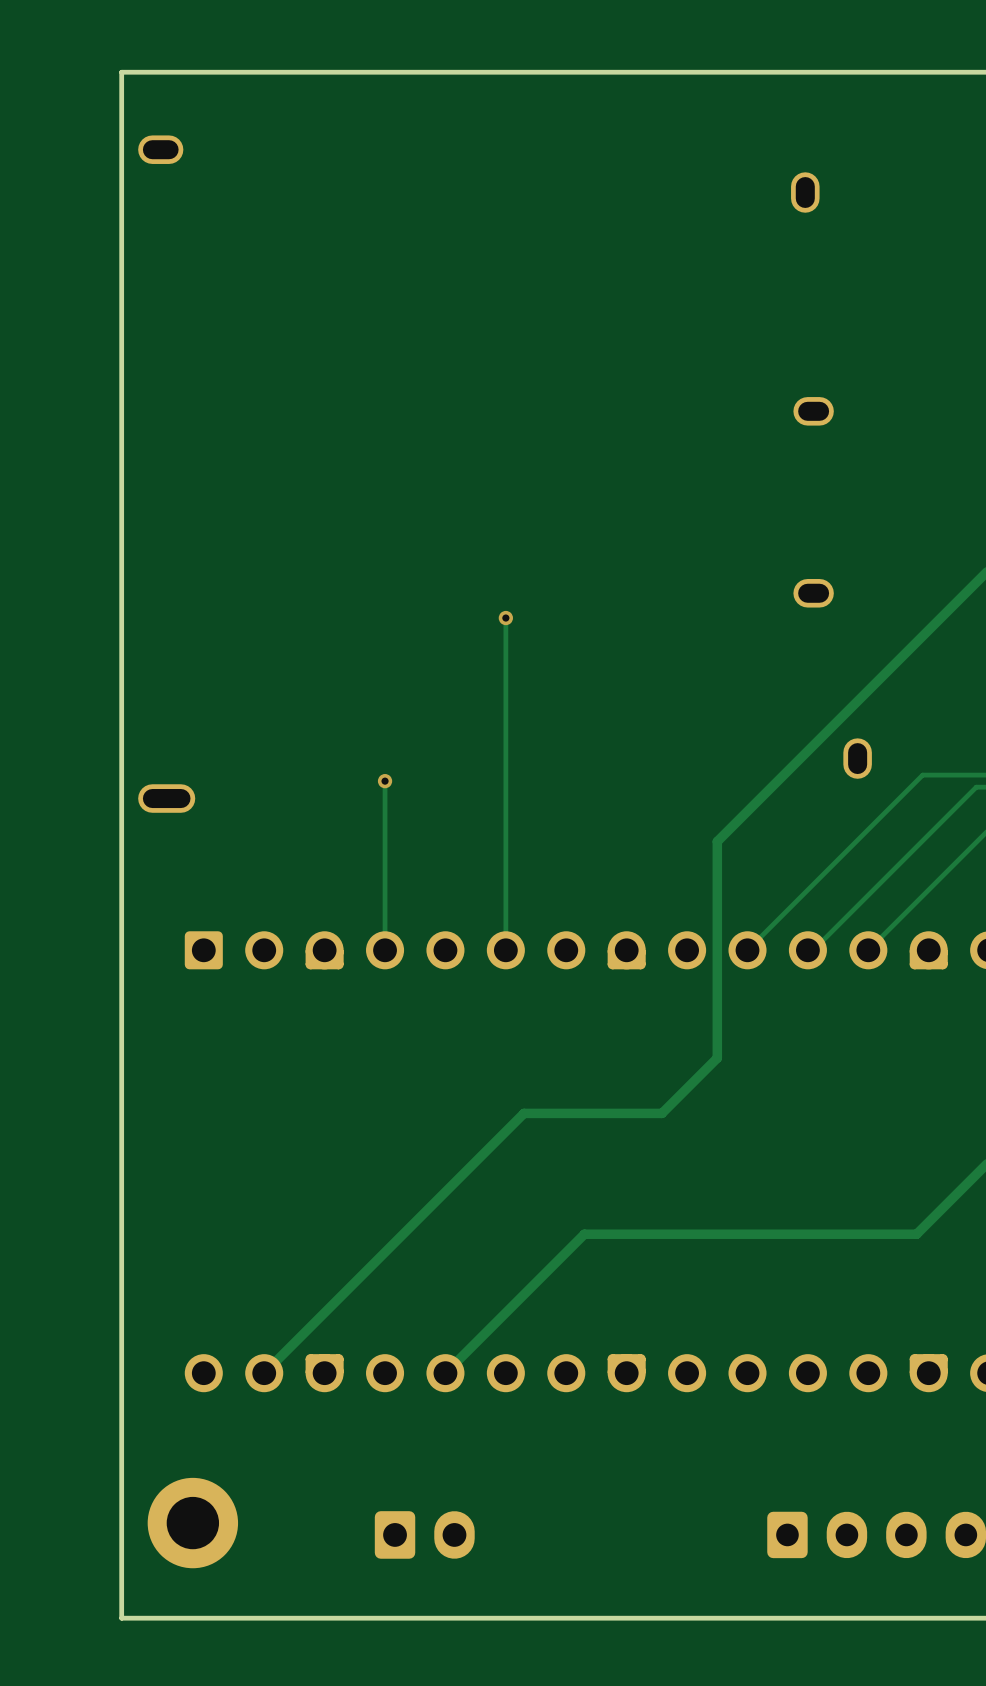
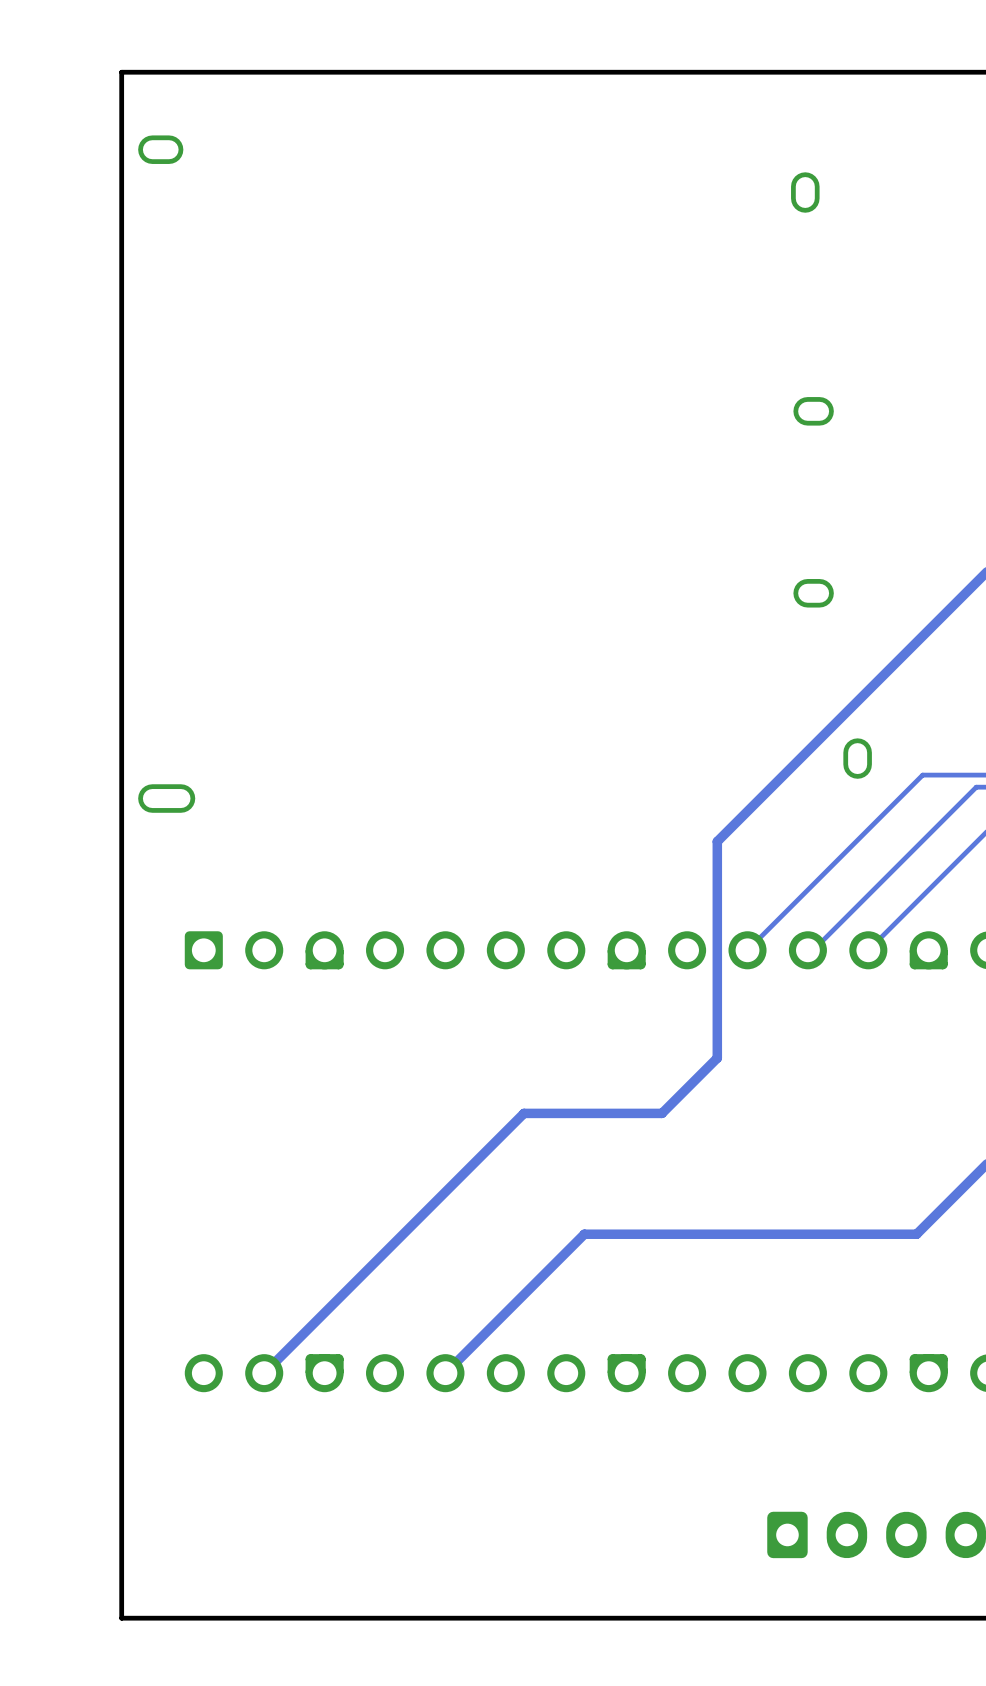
track: (505, 618) (505, 950) -> none
via: (505, 618) -> none
track: (385, 781) (385, 950) -> none
via: (385, 781) -> none
part: (192, 1523) -> none
part: (424, 1534) -> none

